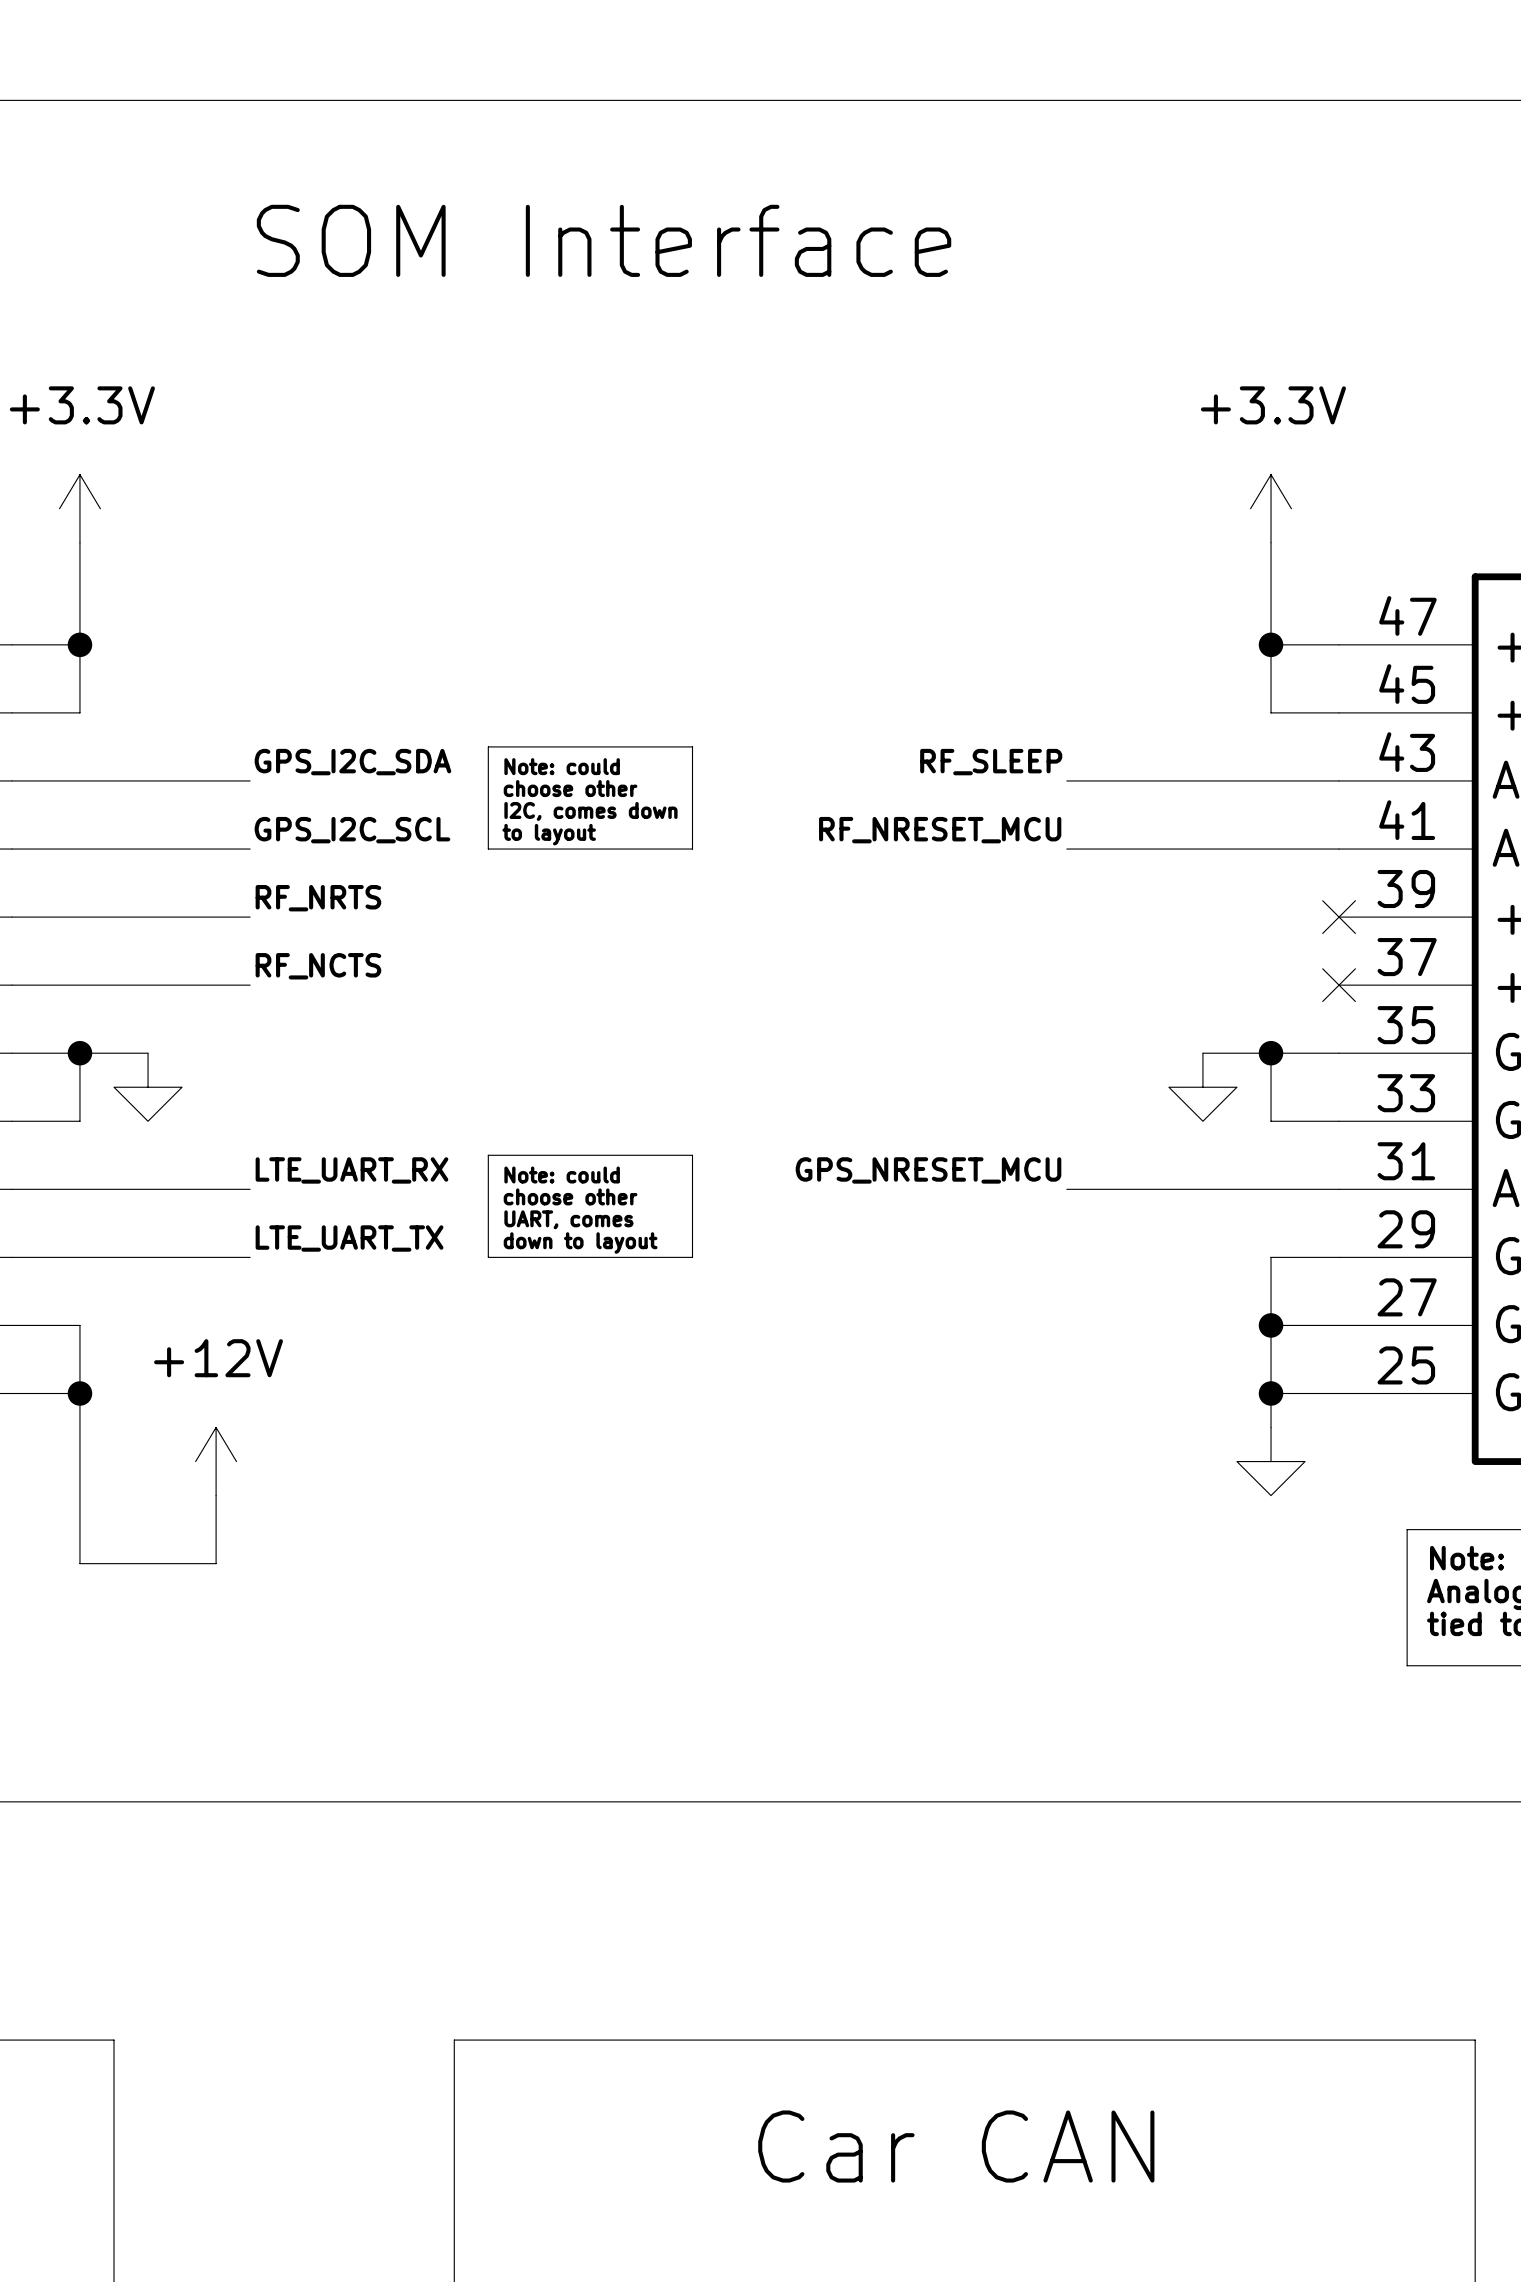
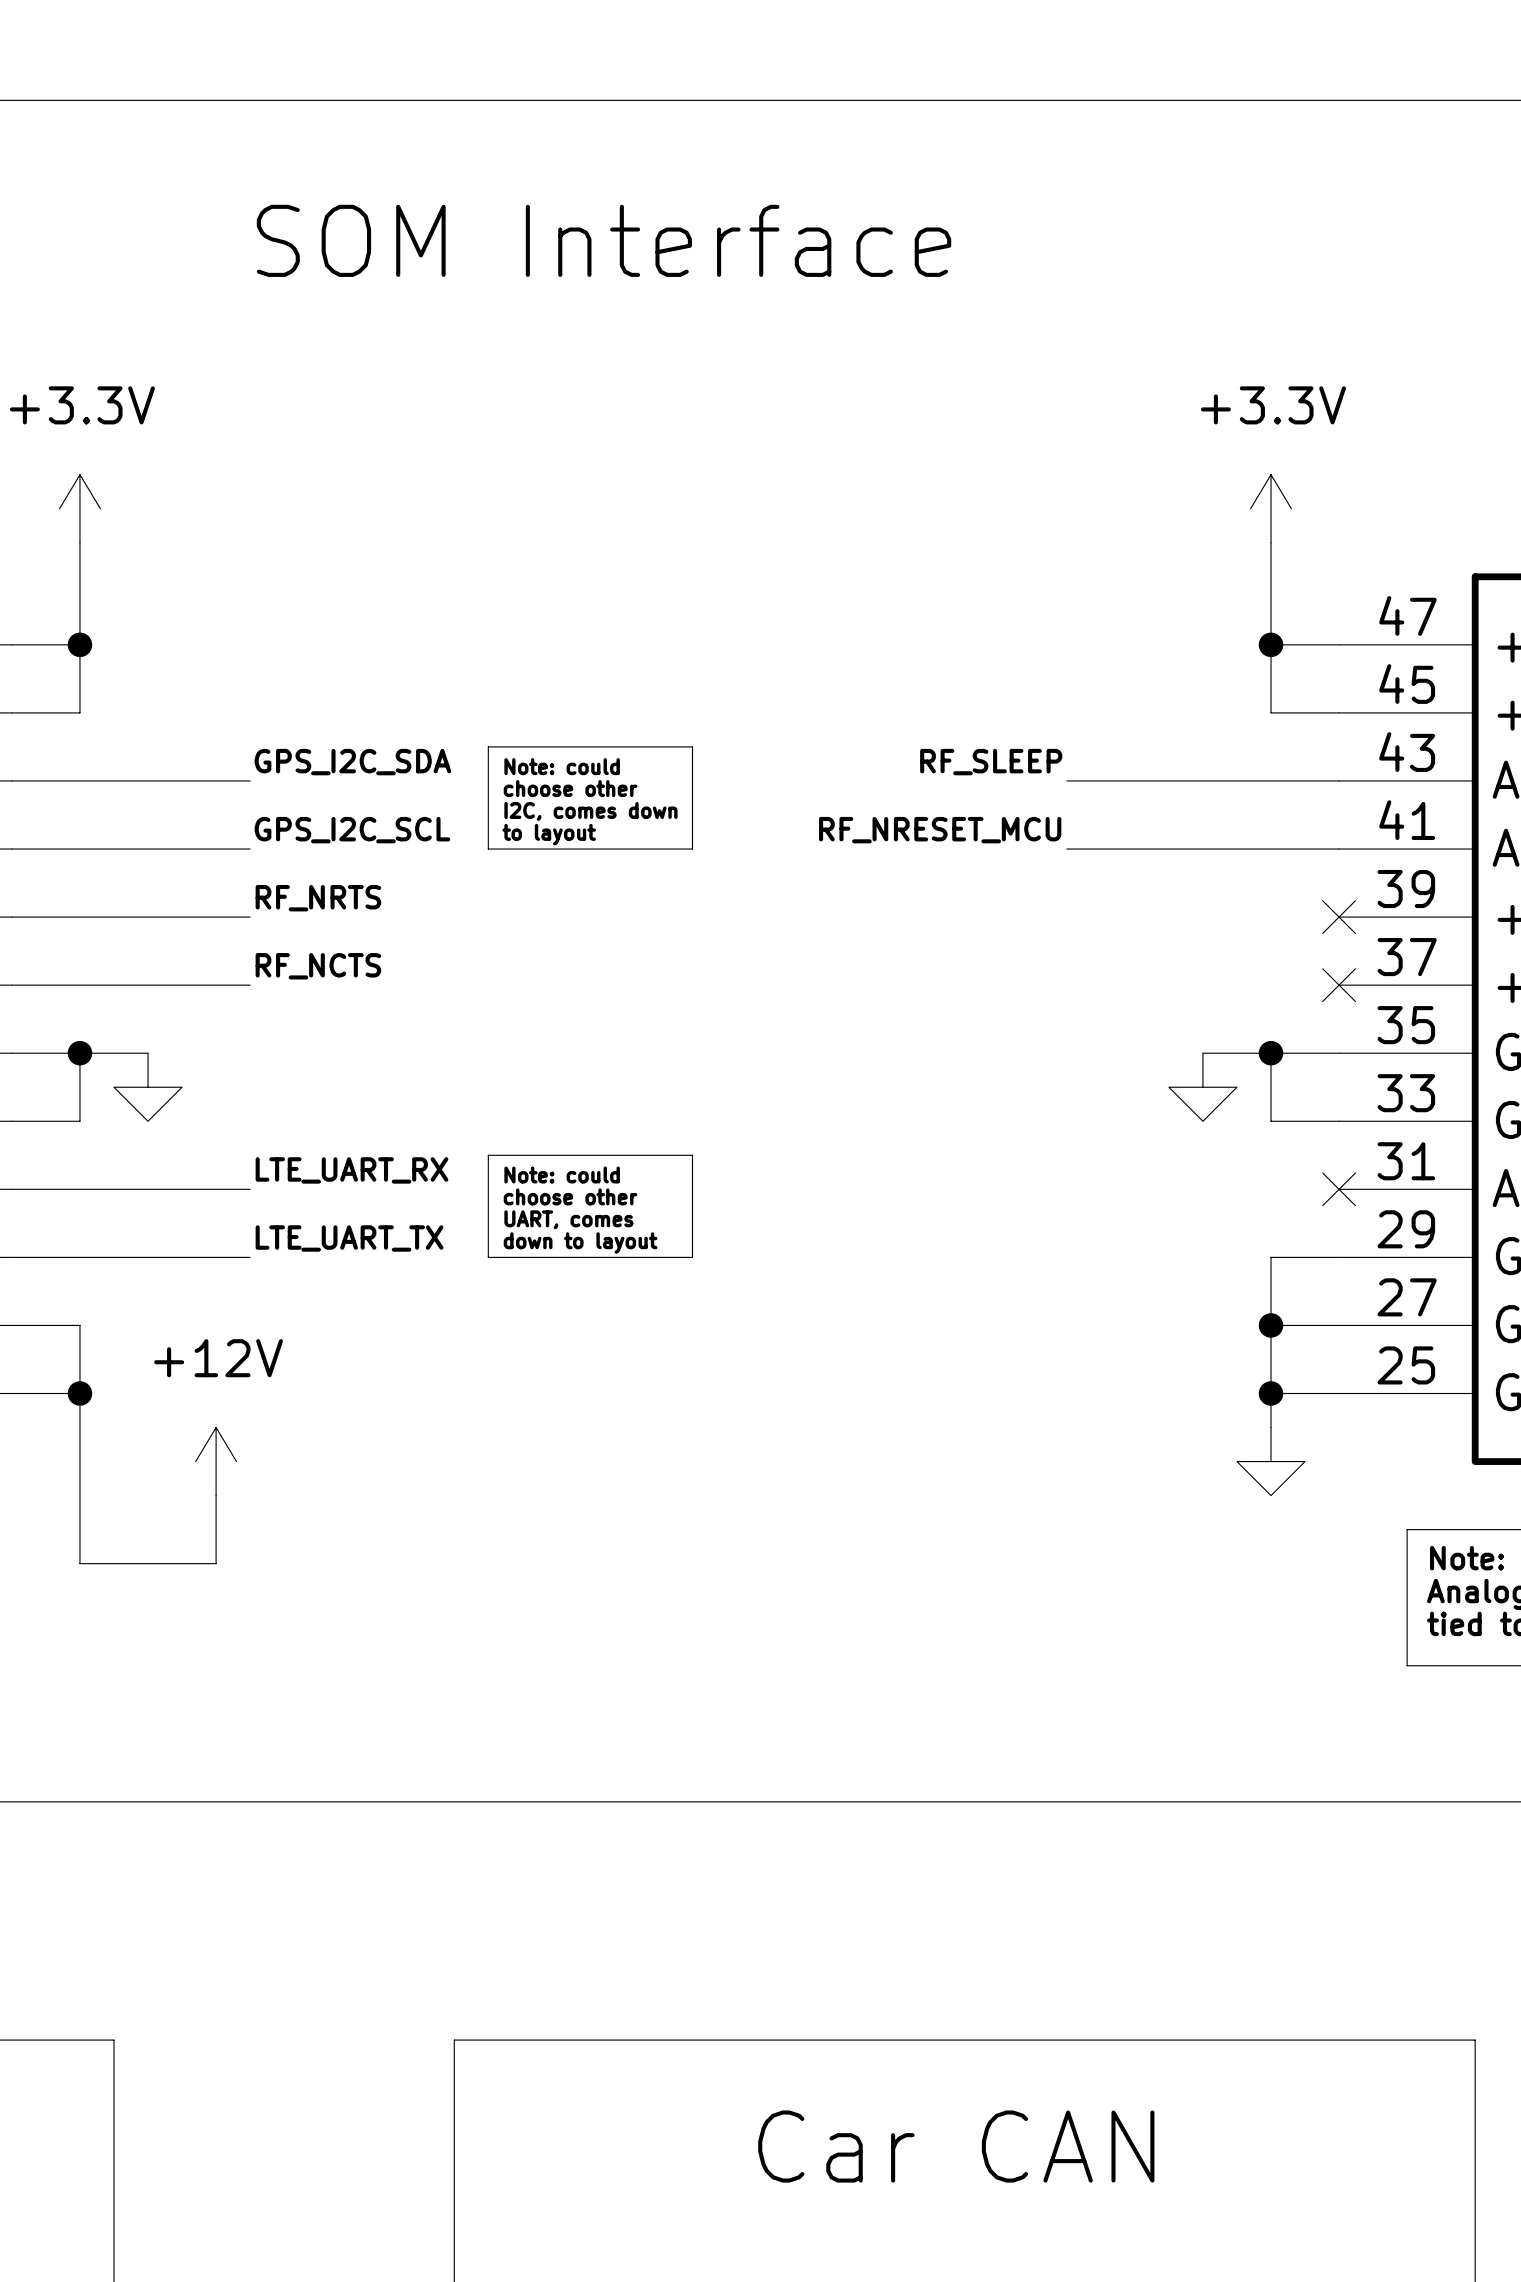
label: GPS_NRESET_MCU (928, 1170) -> none
wire: (1066, 1189) (1339, 1189) -> none
no-connect mark: none -> (1339, 1189)

